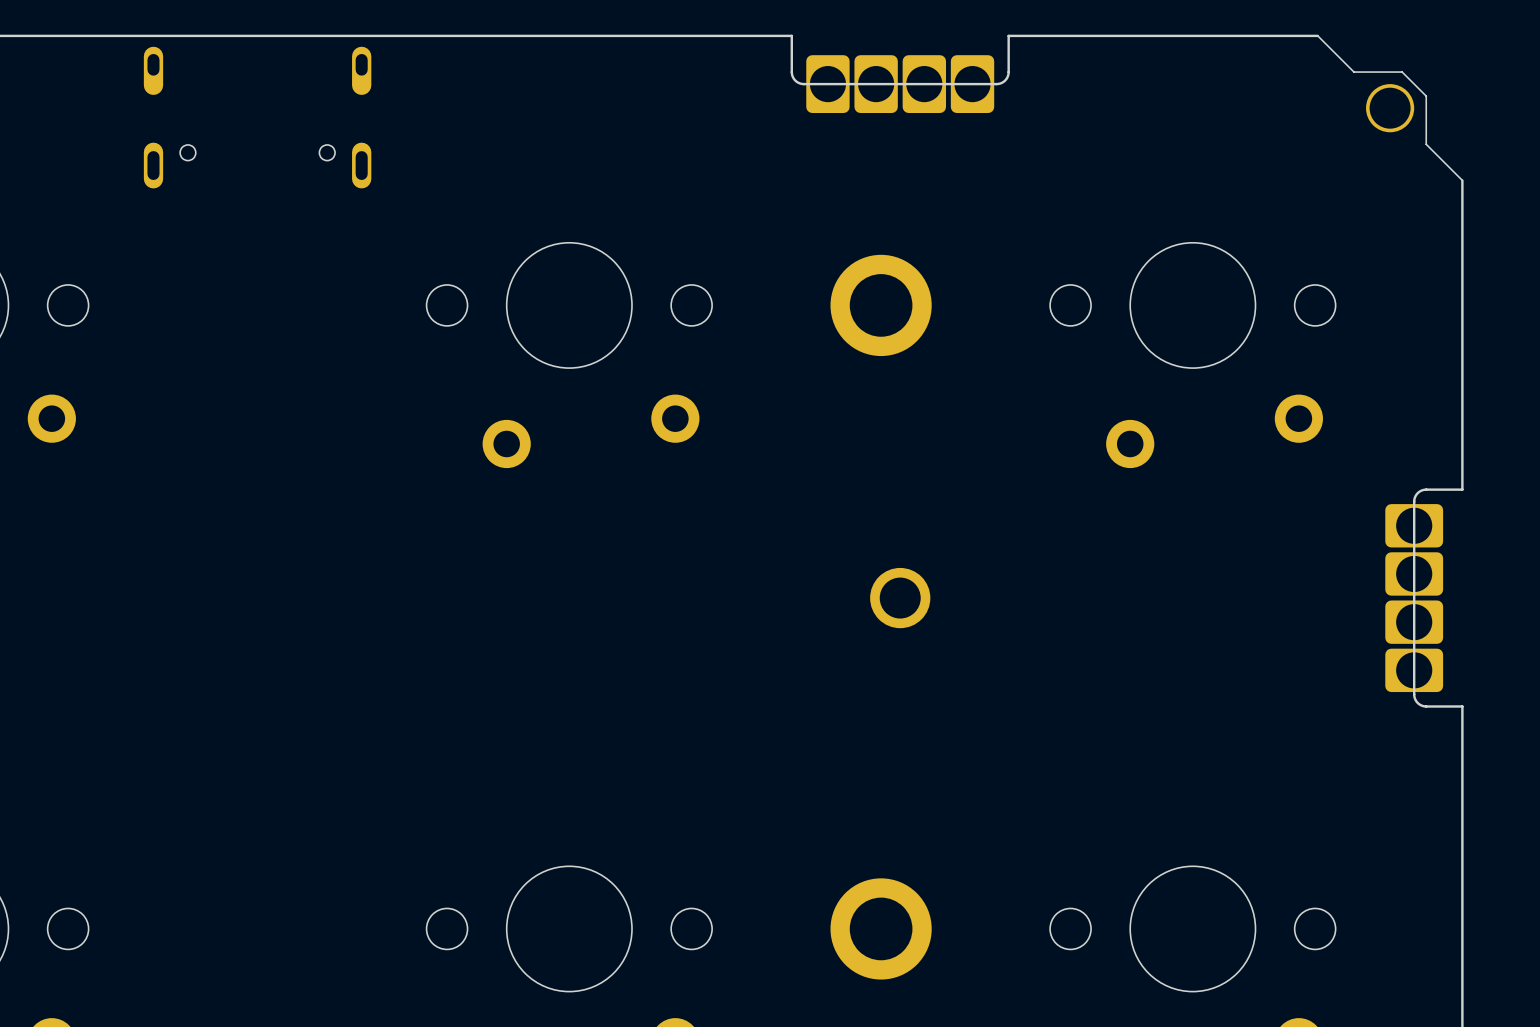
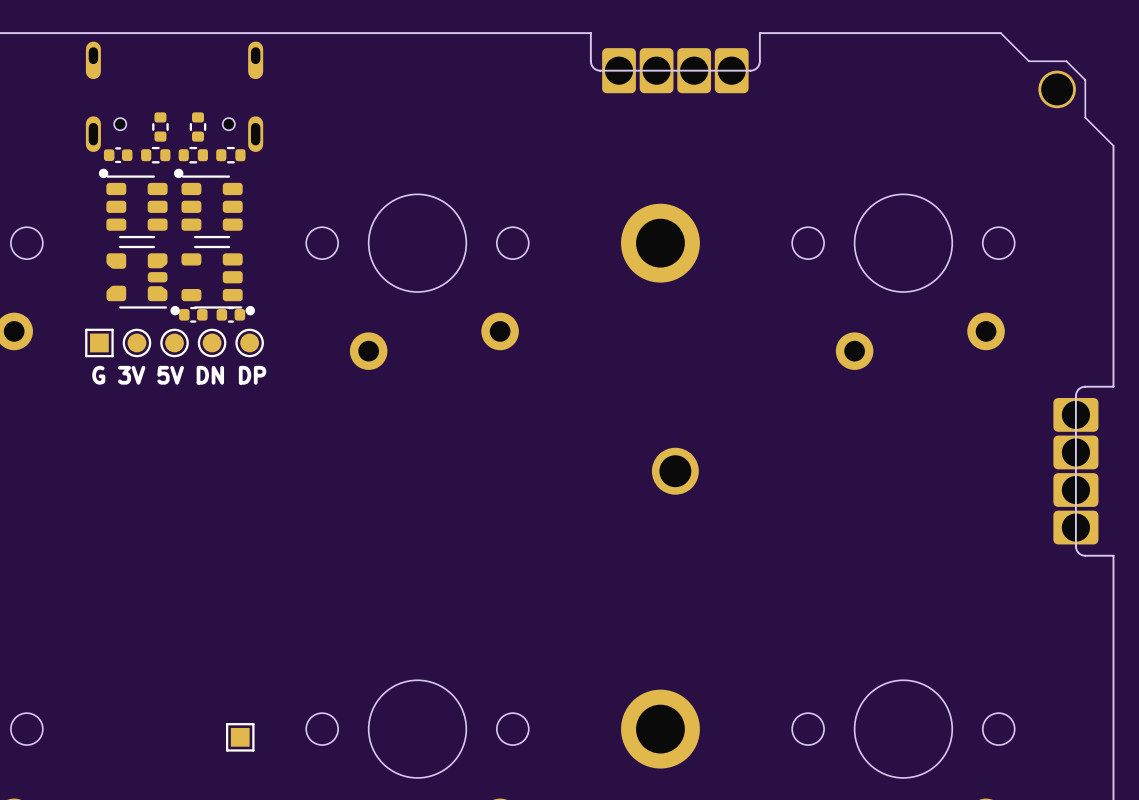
part: none -> (160, 127)
part: none -> (198, 127)
part: none -> (118, 155)
part: none -> (155, 155)
part: none -> (193, 155)
part: none -> (230, 155)
part: none -> (133, 203)
part: none -> (208, 203)
part: none -> (143, 280)
part: none -> (218, 280)
part: none -> (193, 314)
part: none -> (230, 314)
part: none -> (99, 342)
part: none -> (136, 342)
part: none -> (174, 342)
part: none -> (212, 342)
part: none -> (249, 342)
text: none -> G 3V 5V DN DP (179, 375)
part: none -> (240, 737)

